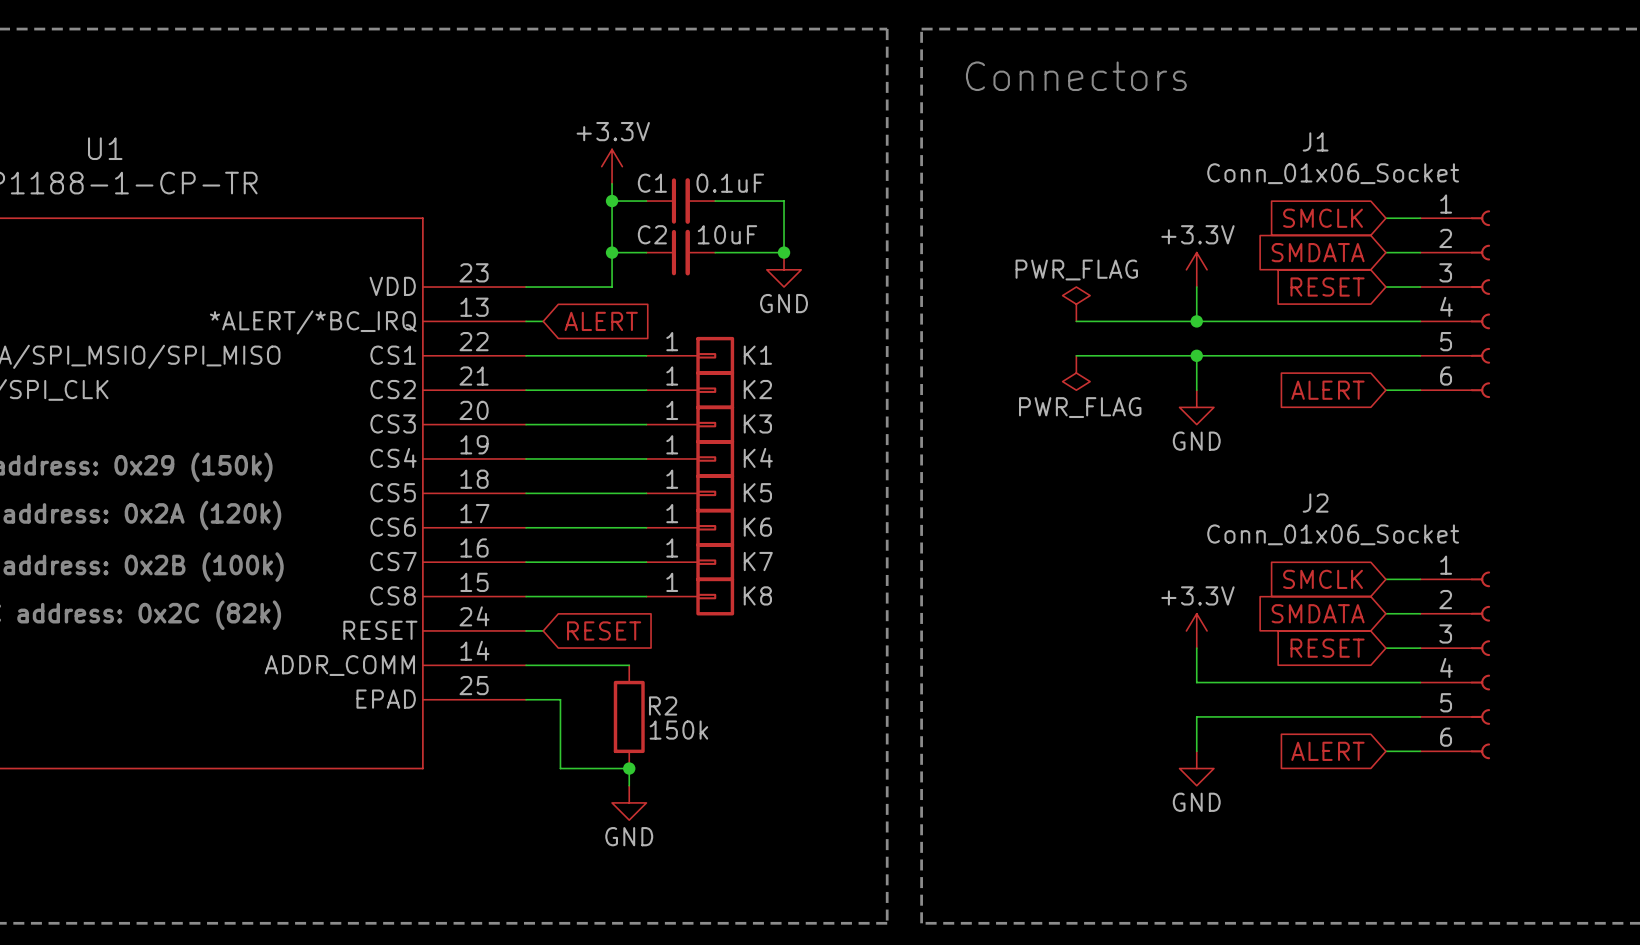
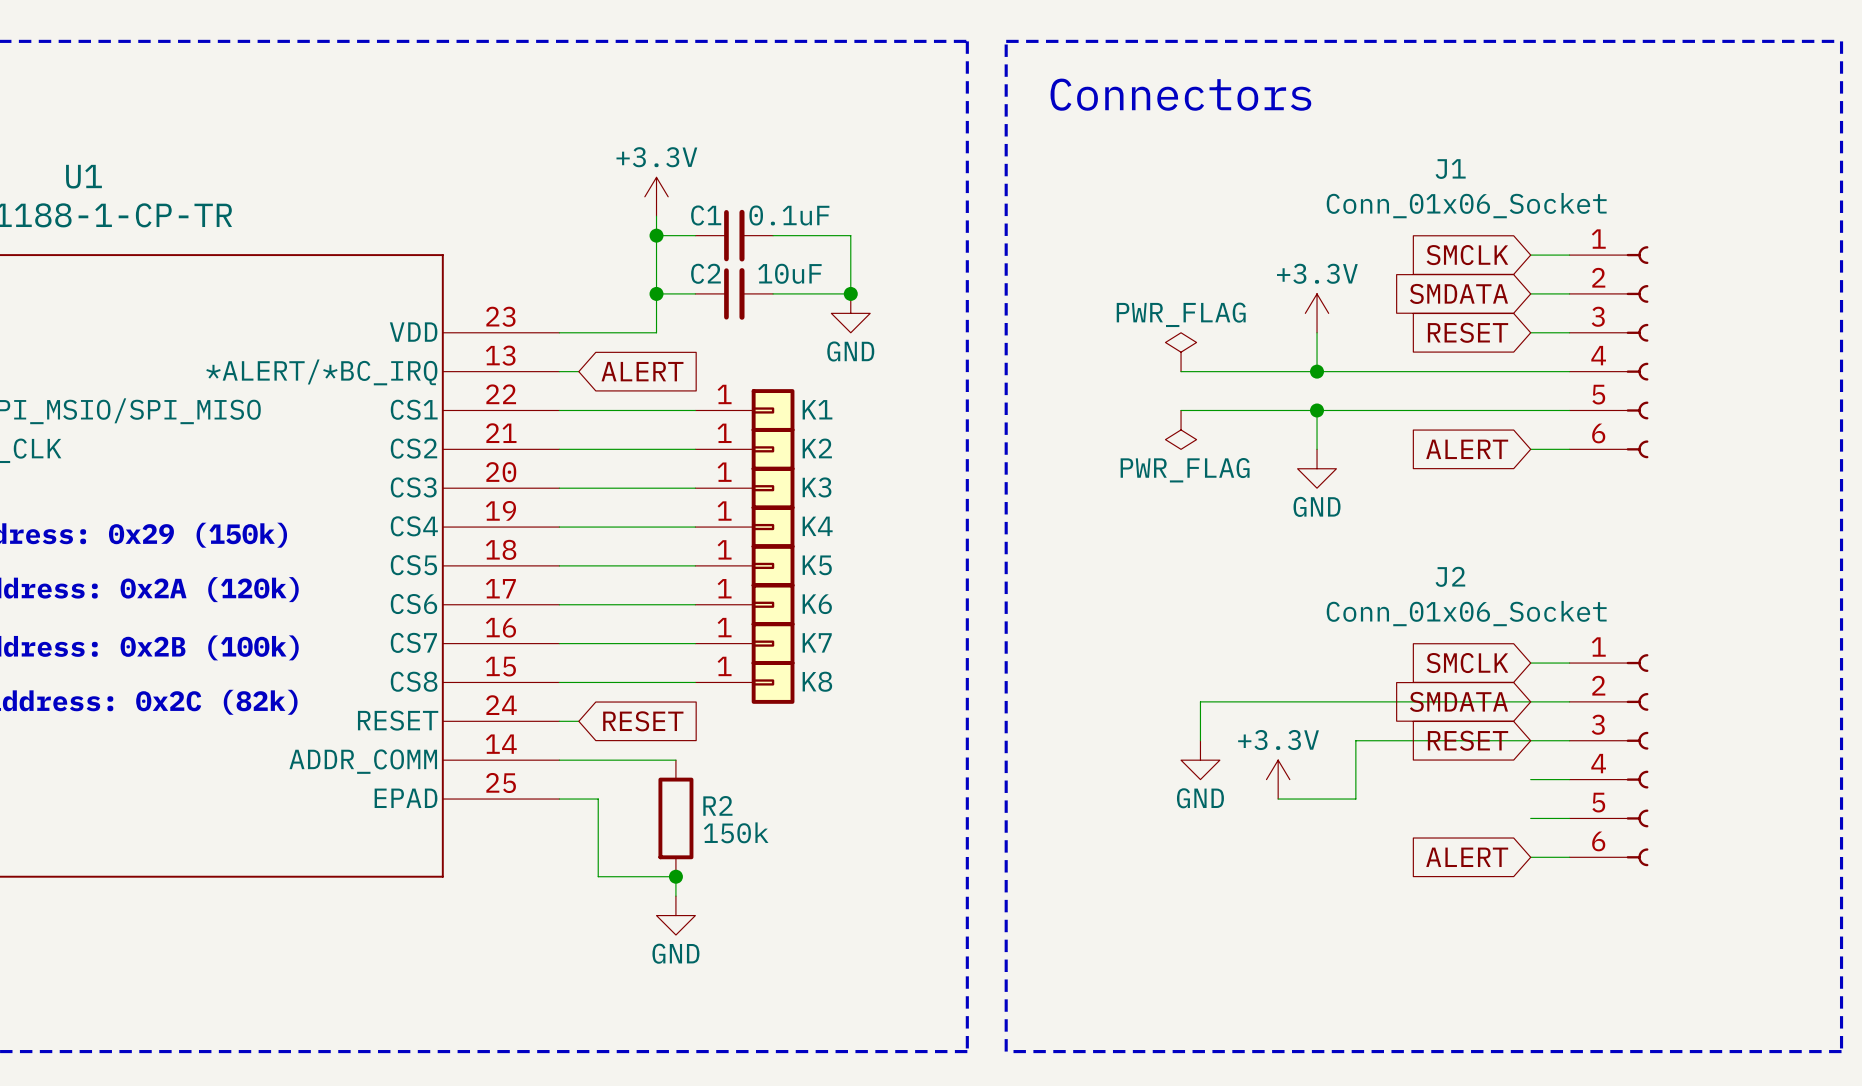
wire: none -> (1530, 701) (1200, 701) (1200, 740)
power symbol position: +3.3V (1196, 630) -> +3.3V (1278, 779)
wire: (1196, 648) (1196, 682) (1385, 682) -> none
wire: none -> (1530, 740) (1355, 740) (1355, 799) (1278, 799)
wire: (1385, 716) (1196, 716) (1196, 751) -> none
power symbol position: GND (1196, 768) -> GND (1200, 760)

